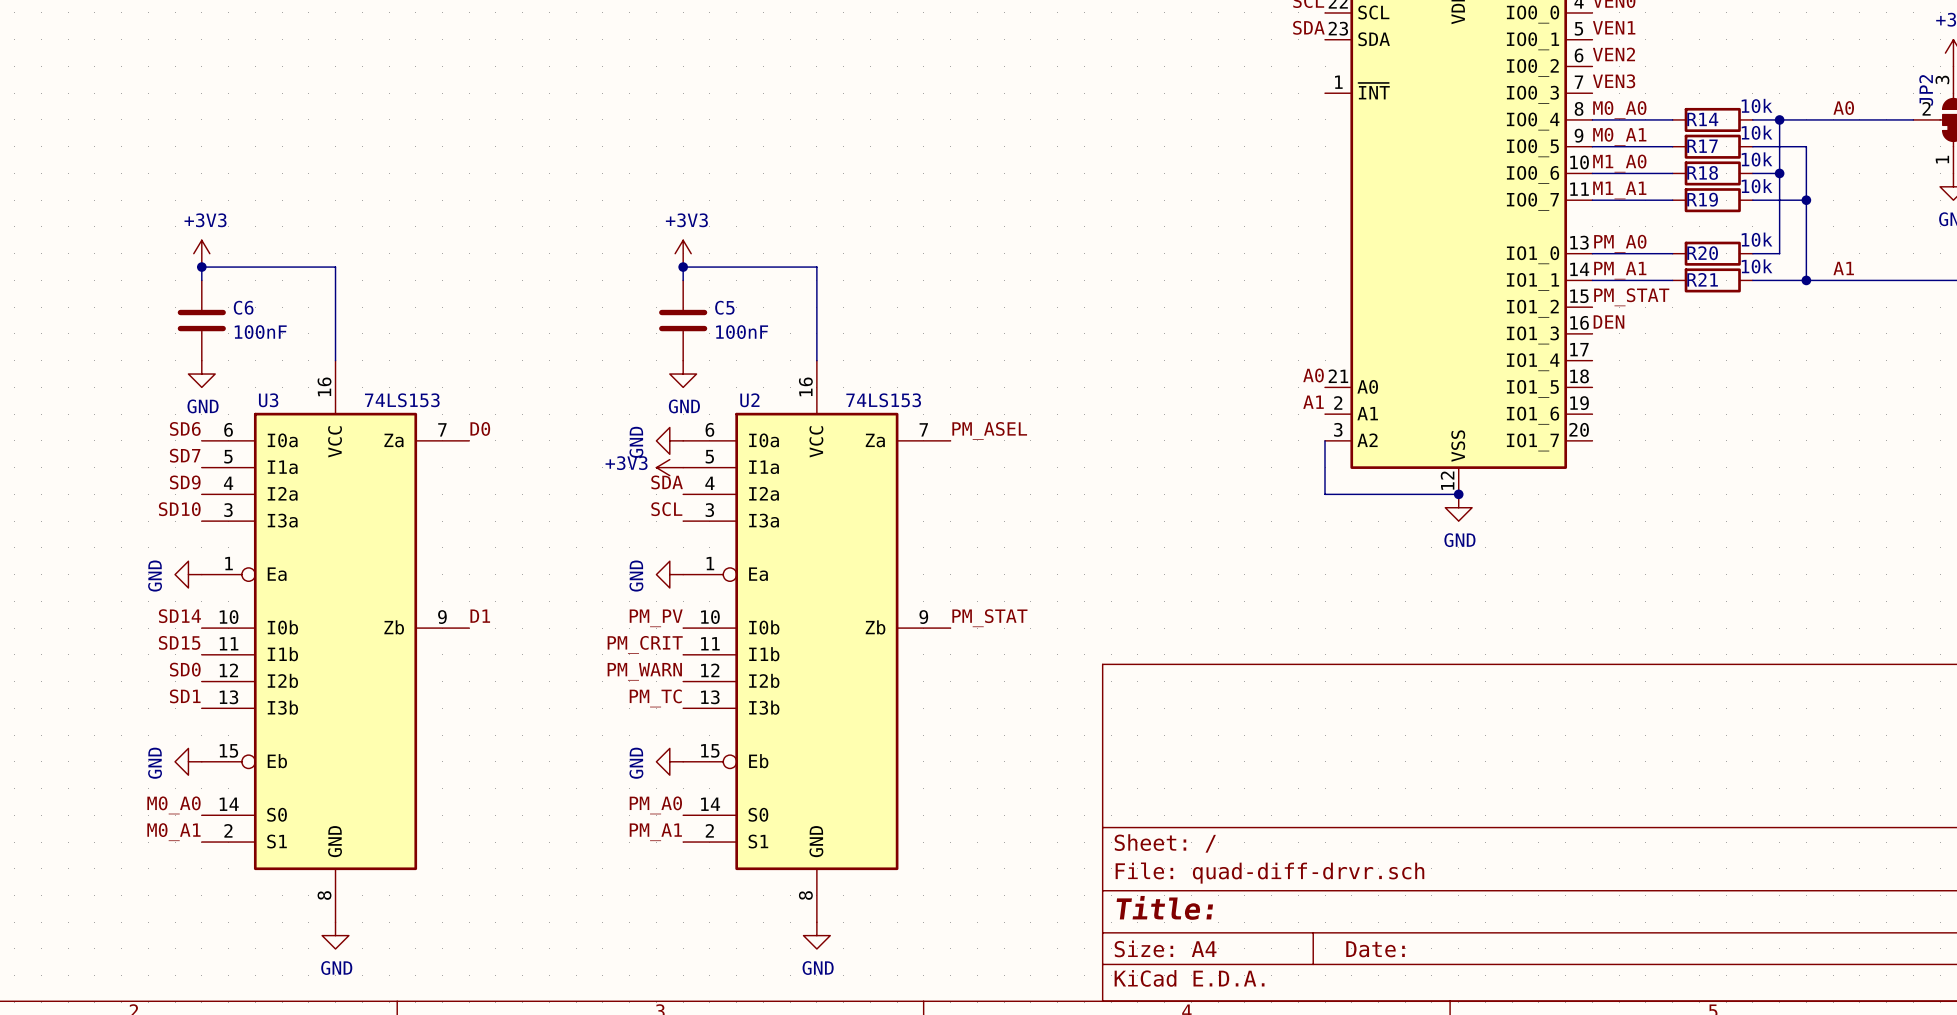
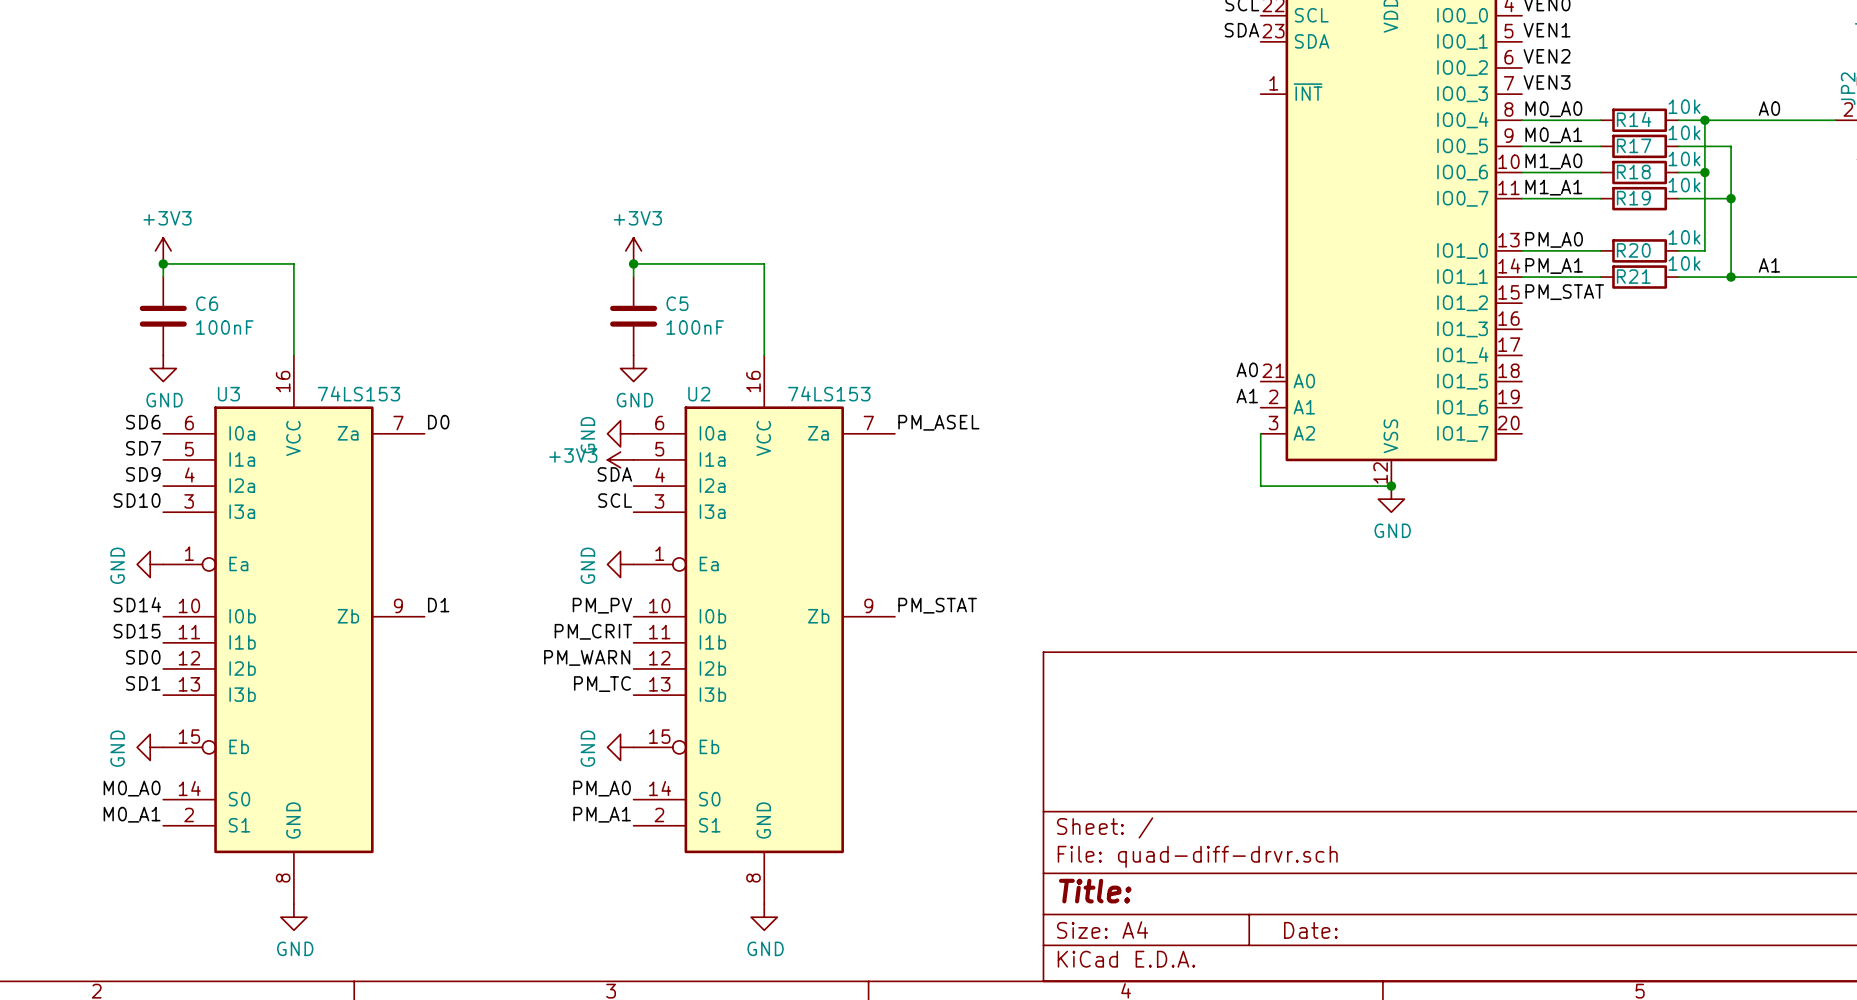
label: DEN (1608, 321) -> none

